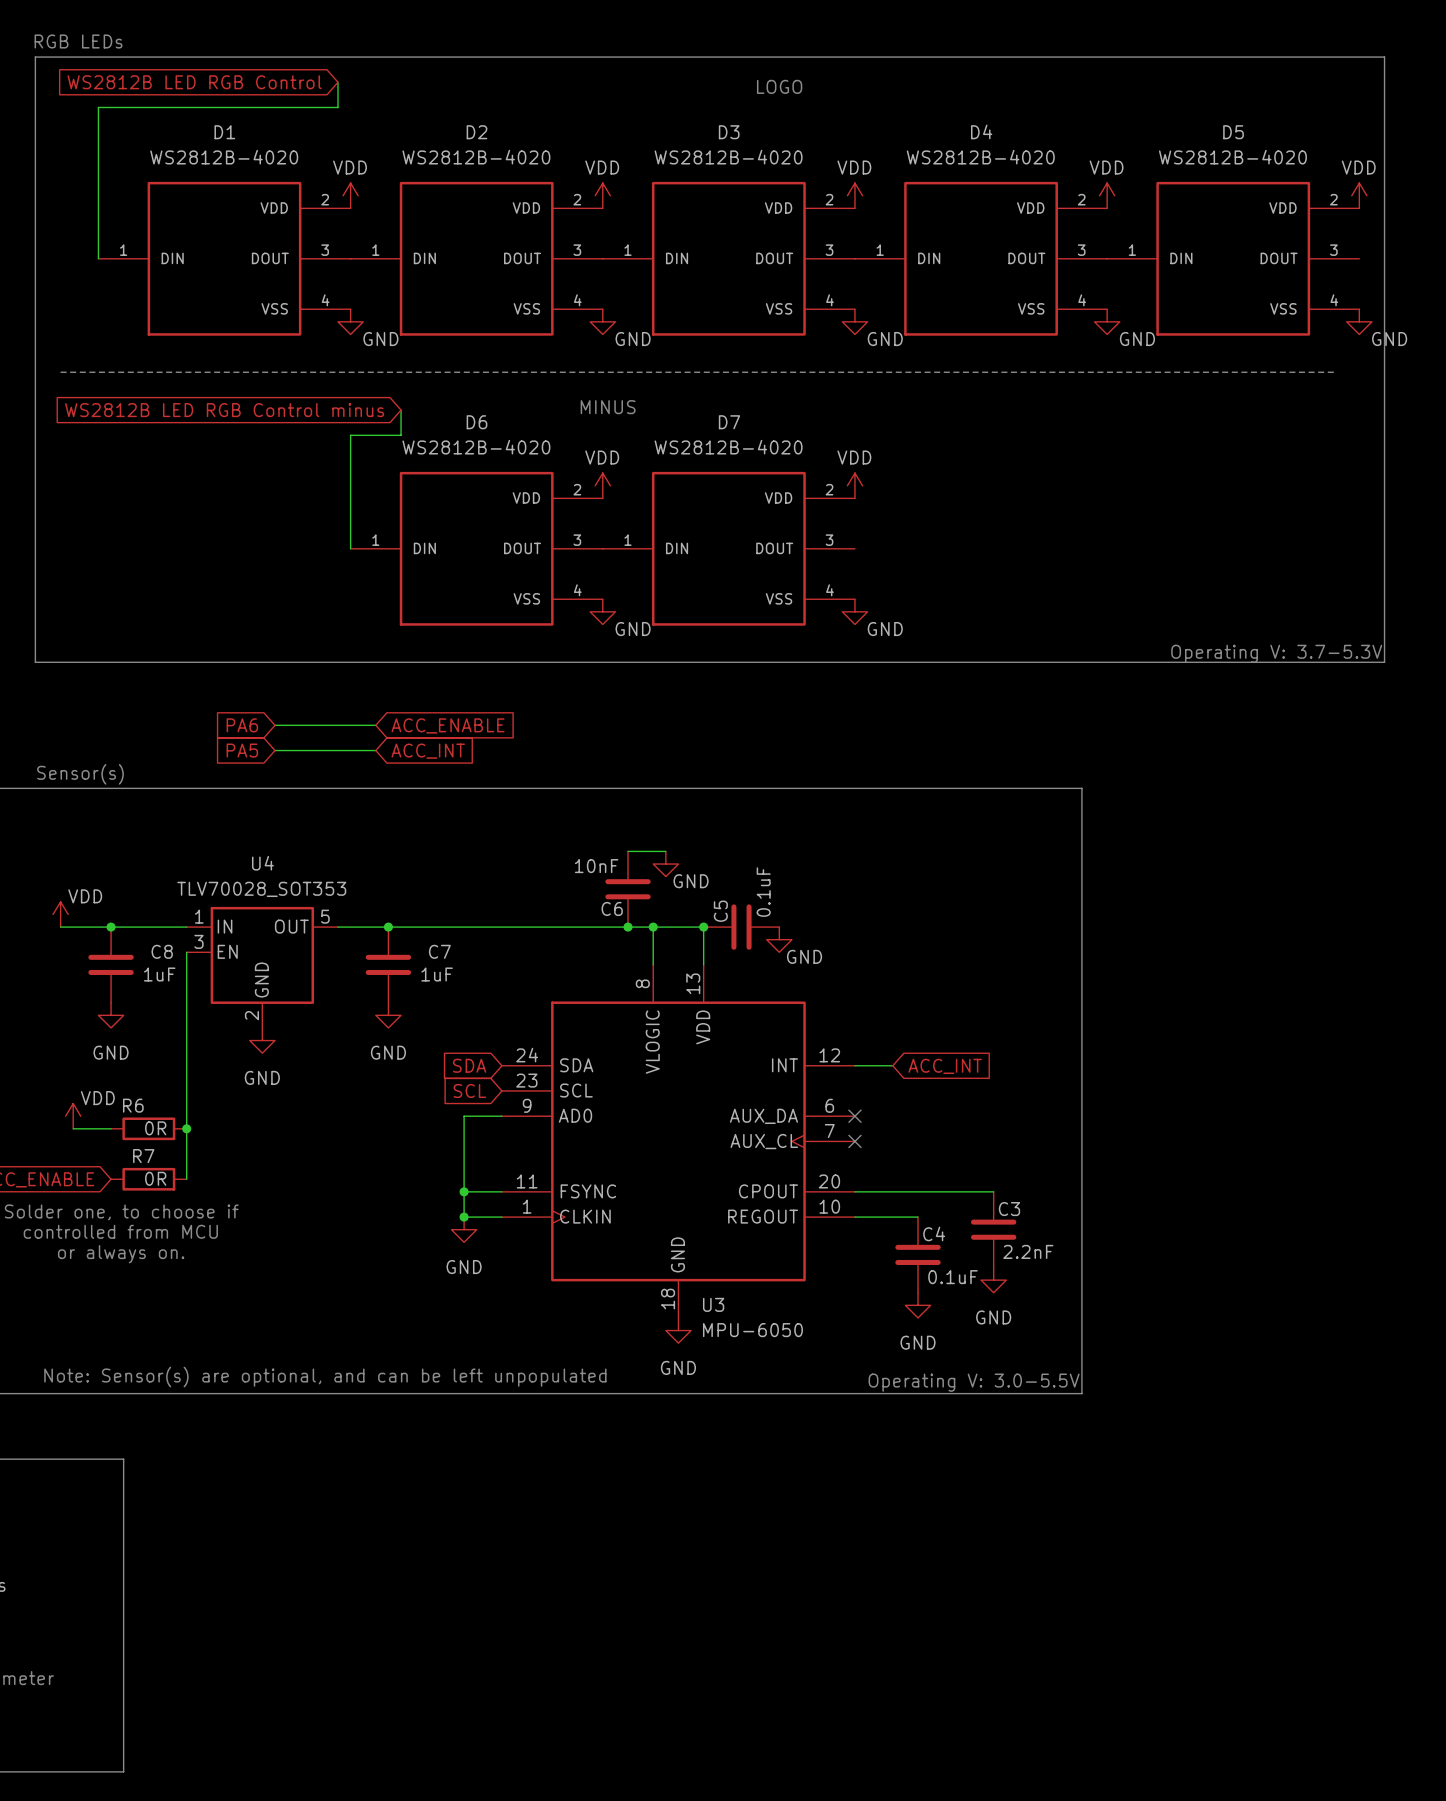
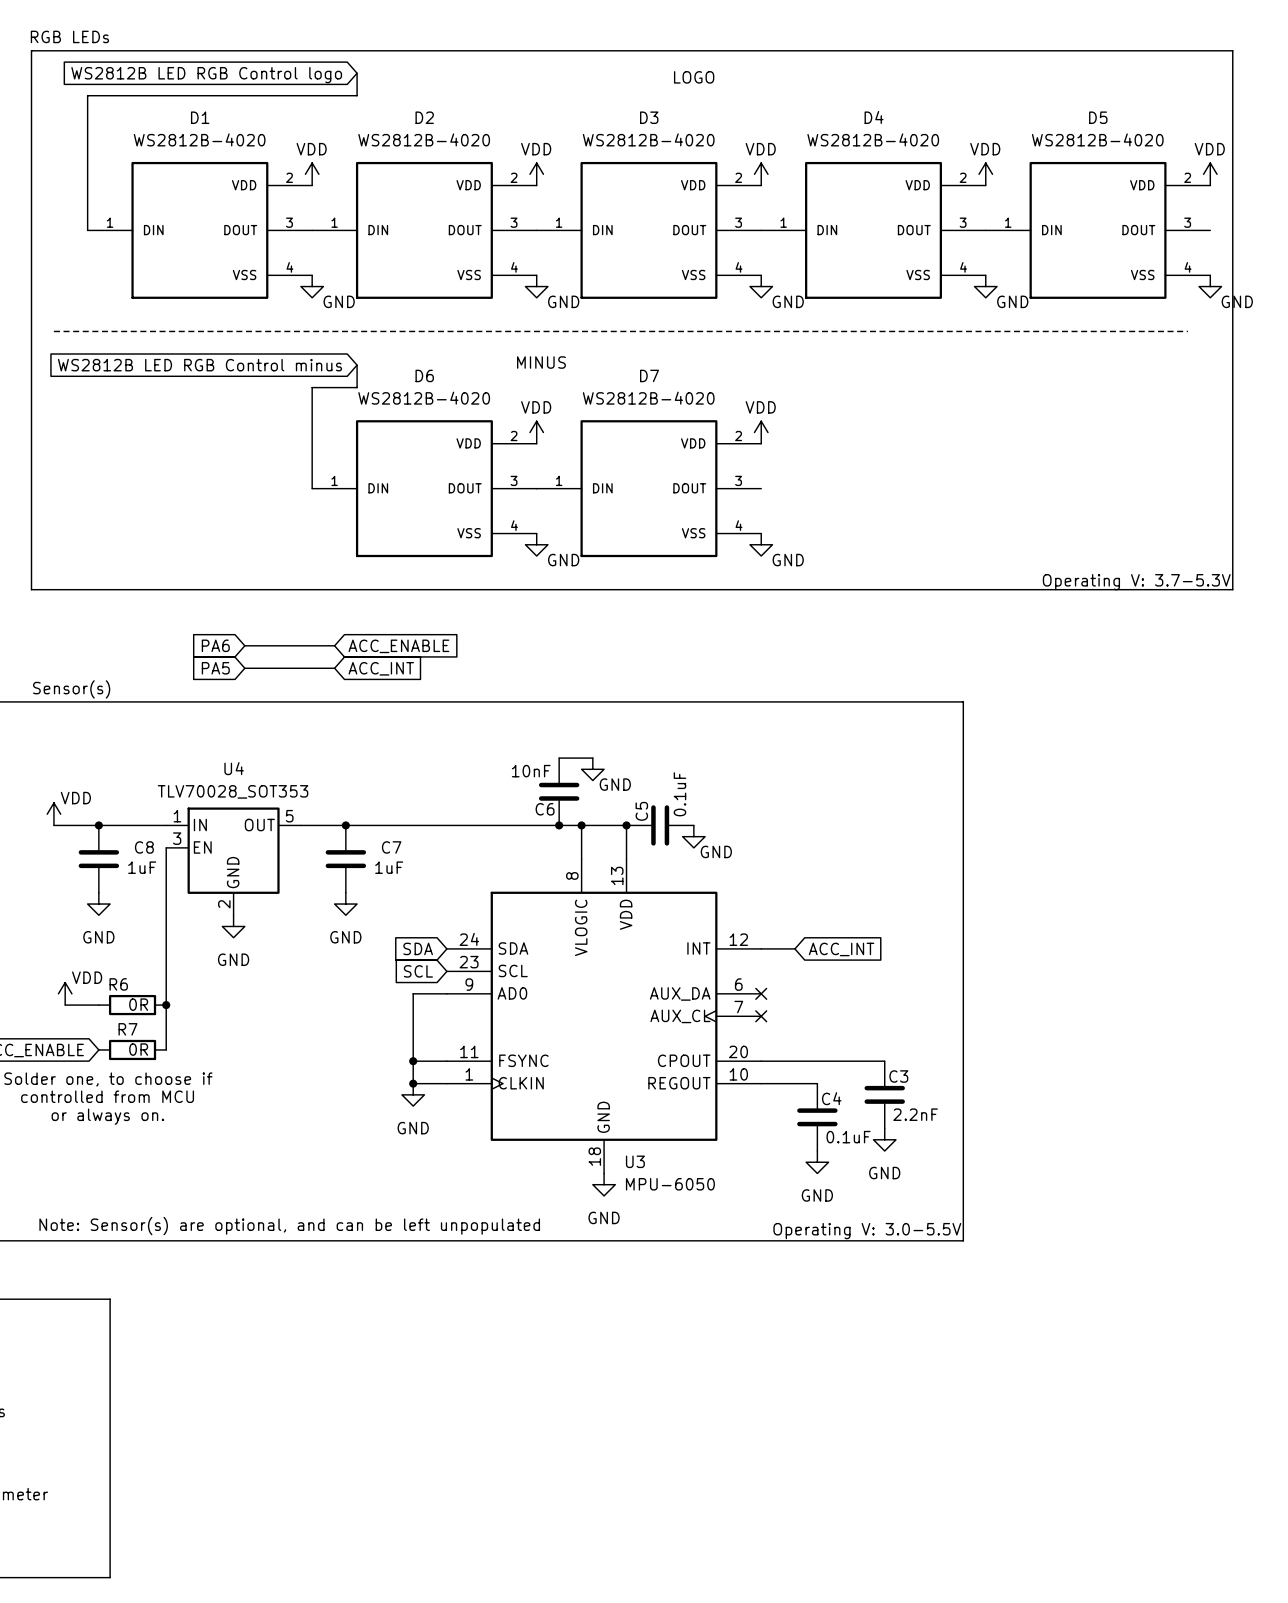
global label: WS2812B LED RGB Control (194, 82) -> WS2812B LED RGB Control logo (206, 75)
wire: (337, 82) (337, 107) -> (357, 73) (357, 95) (300, 95)

